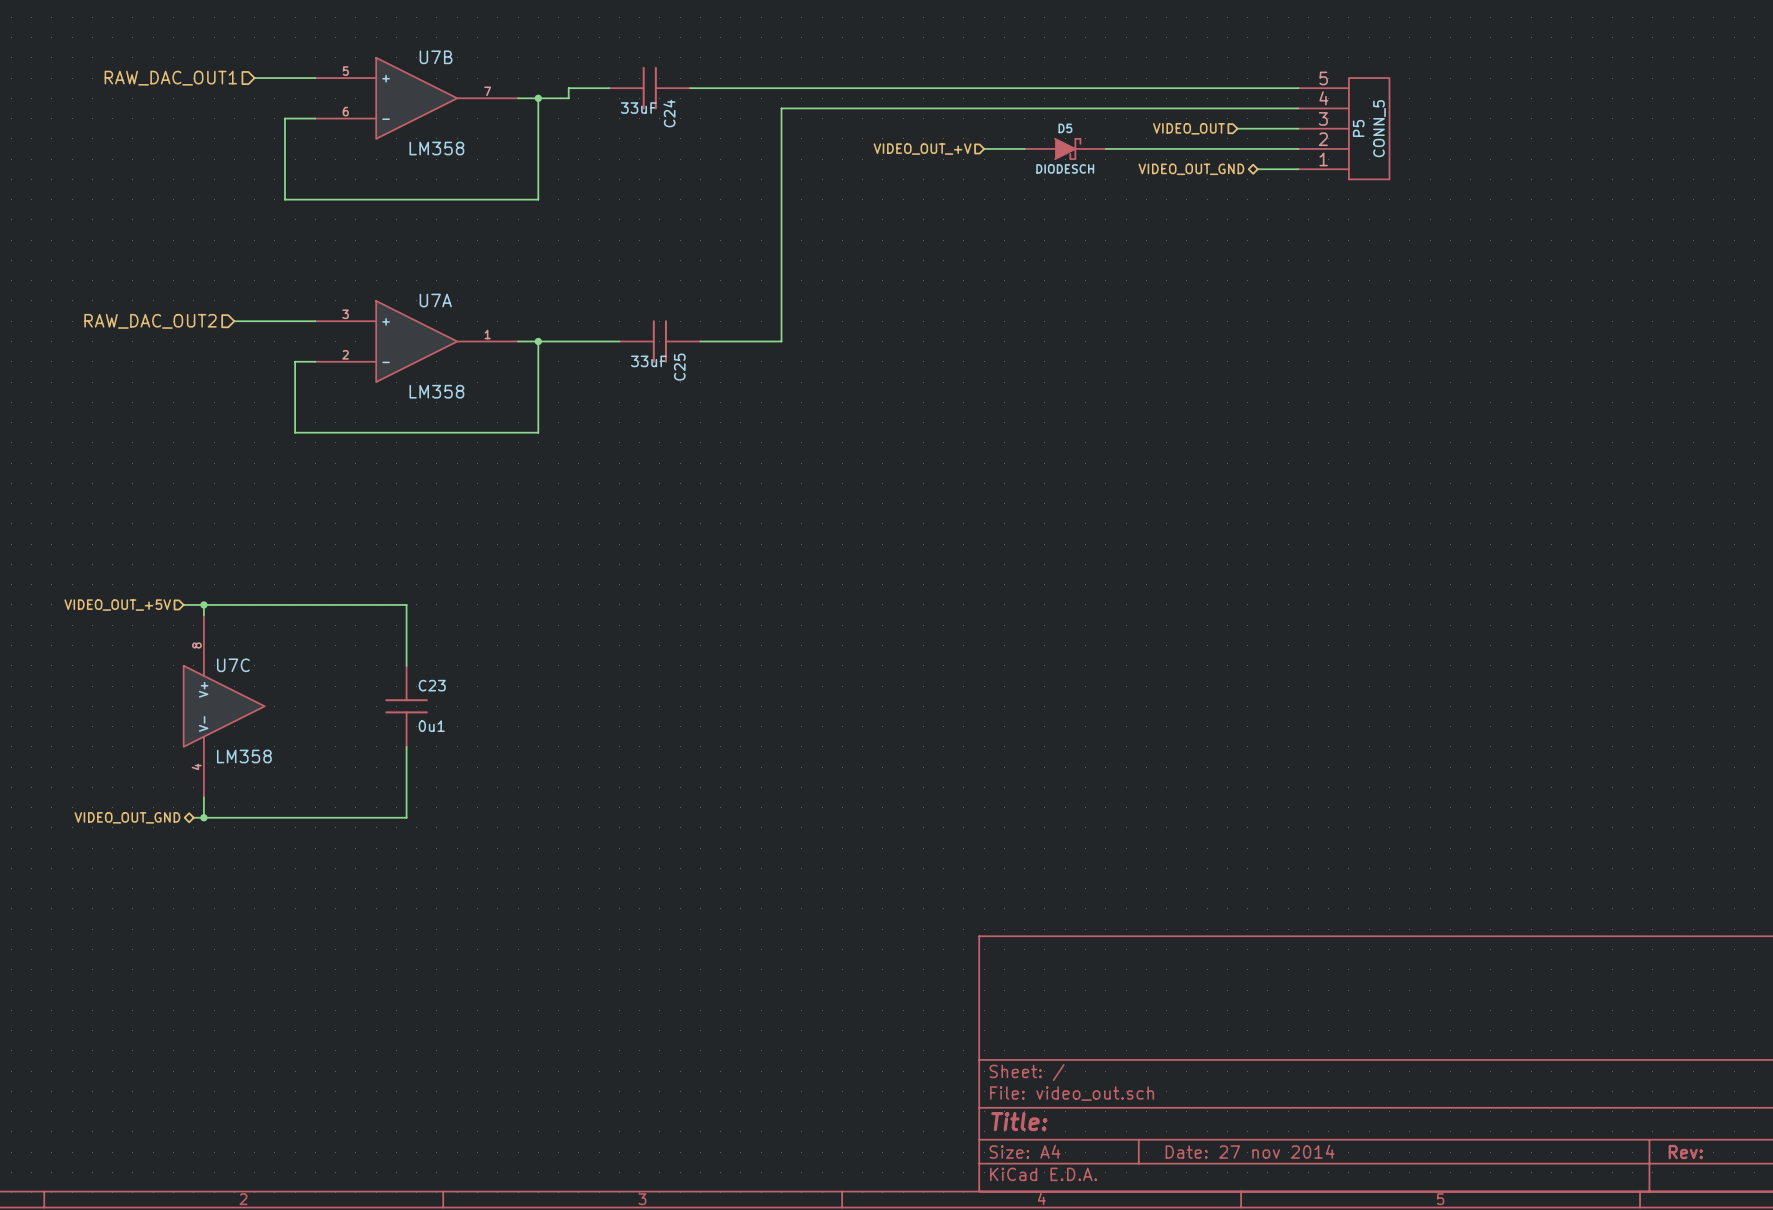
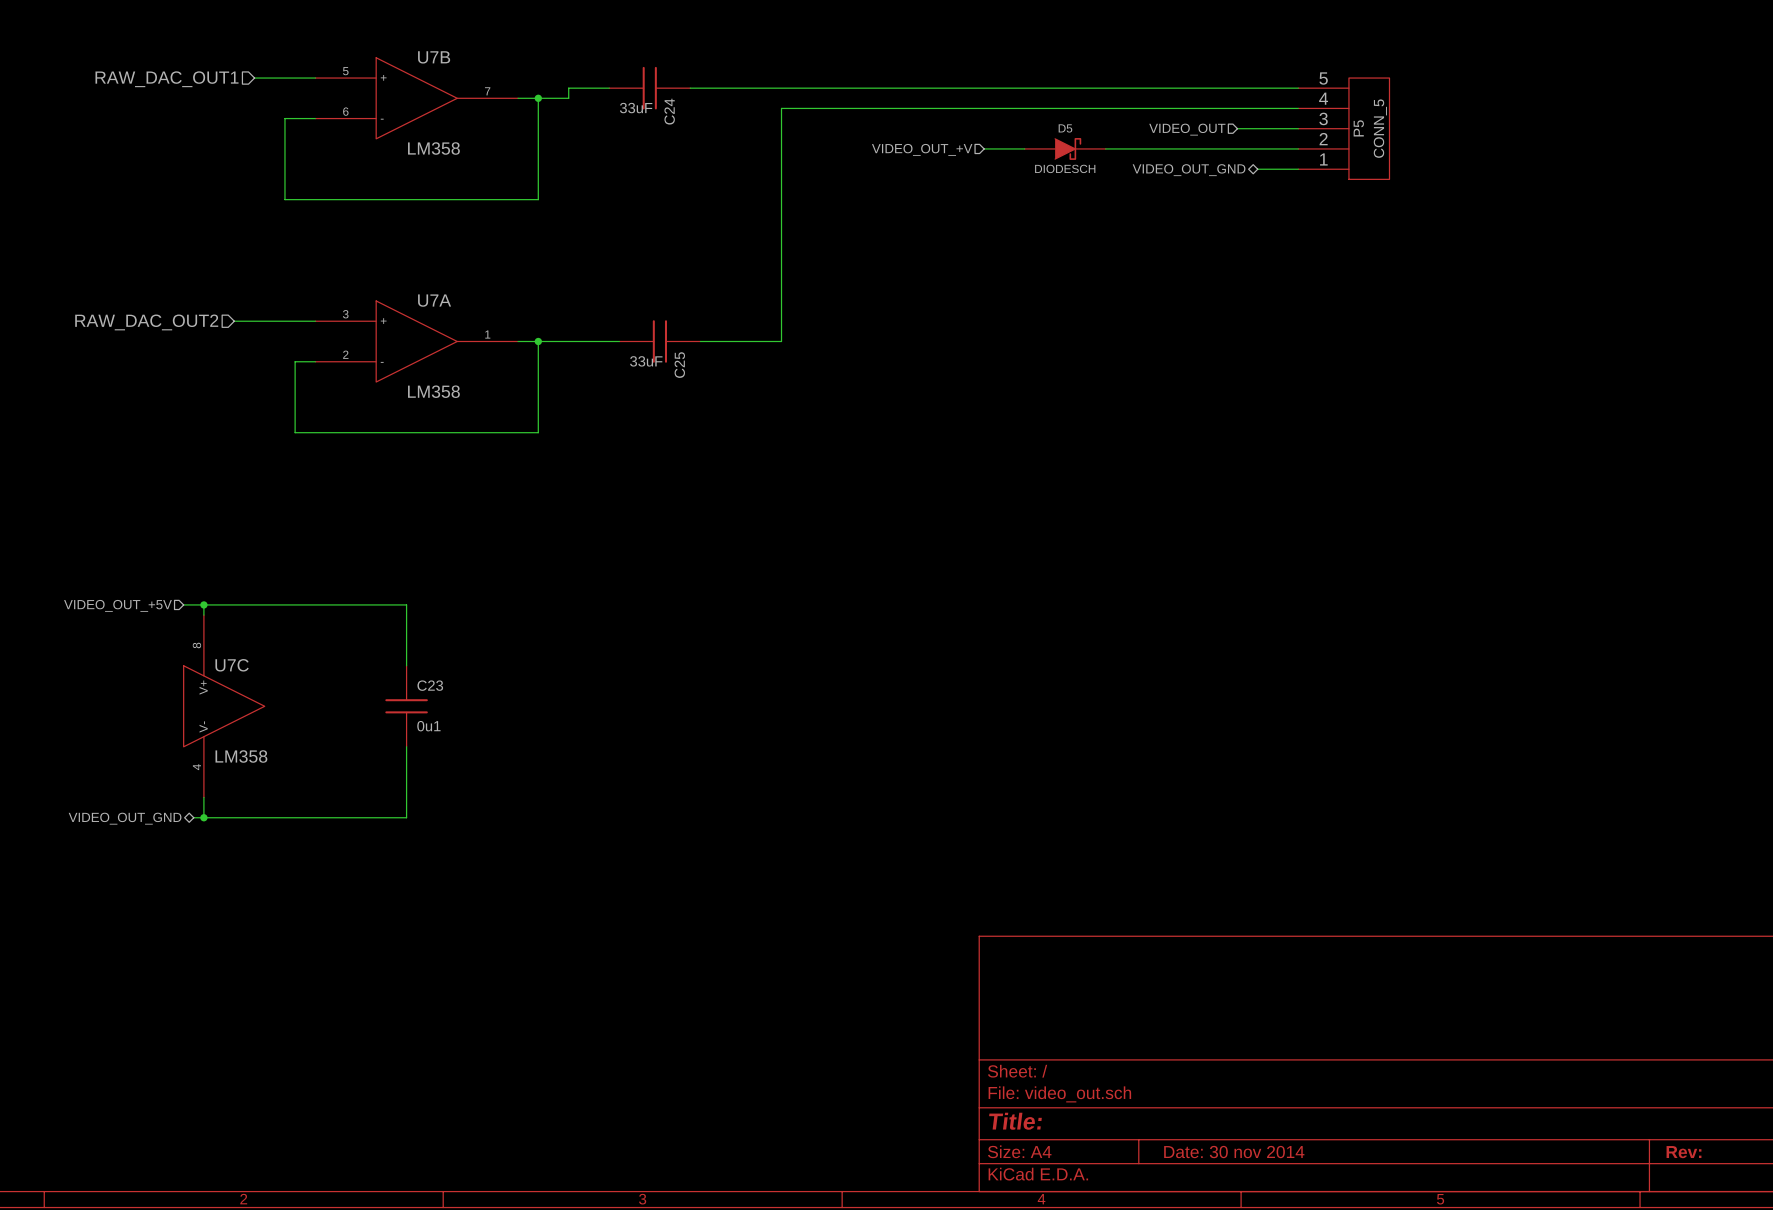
title block: Date: 27 nov 2014 (1250, 1151) -> Date: 30 nov 2014 (1234, 1152)

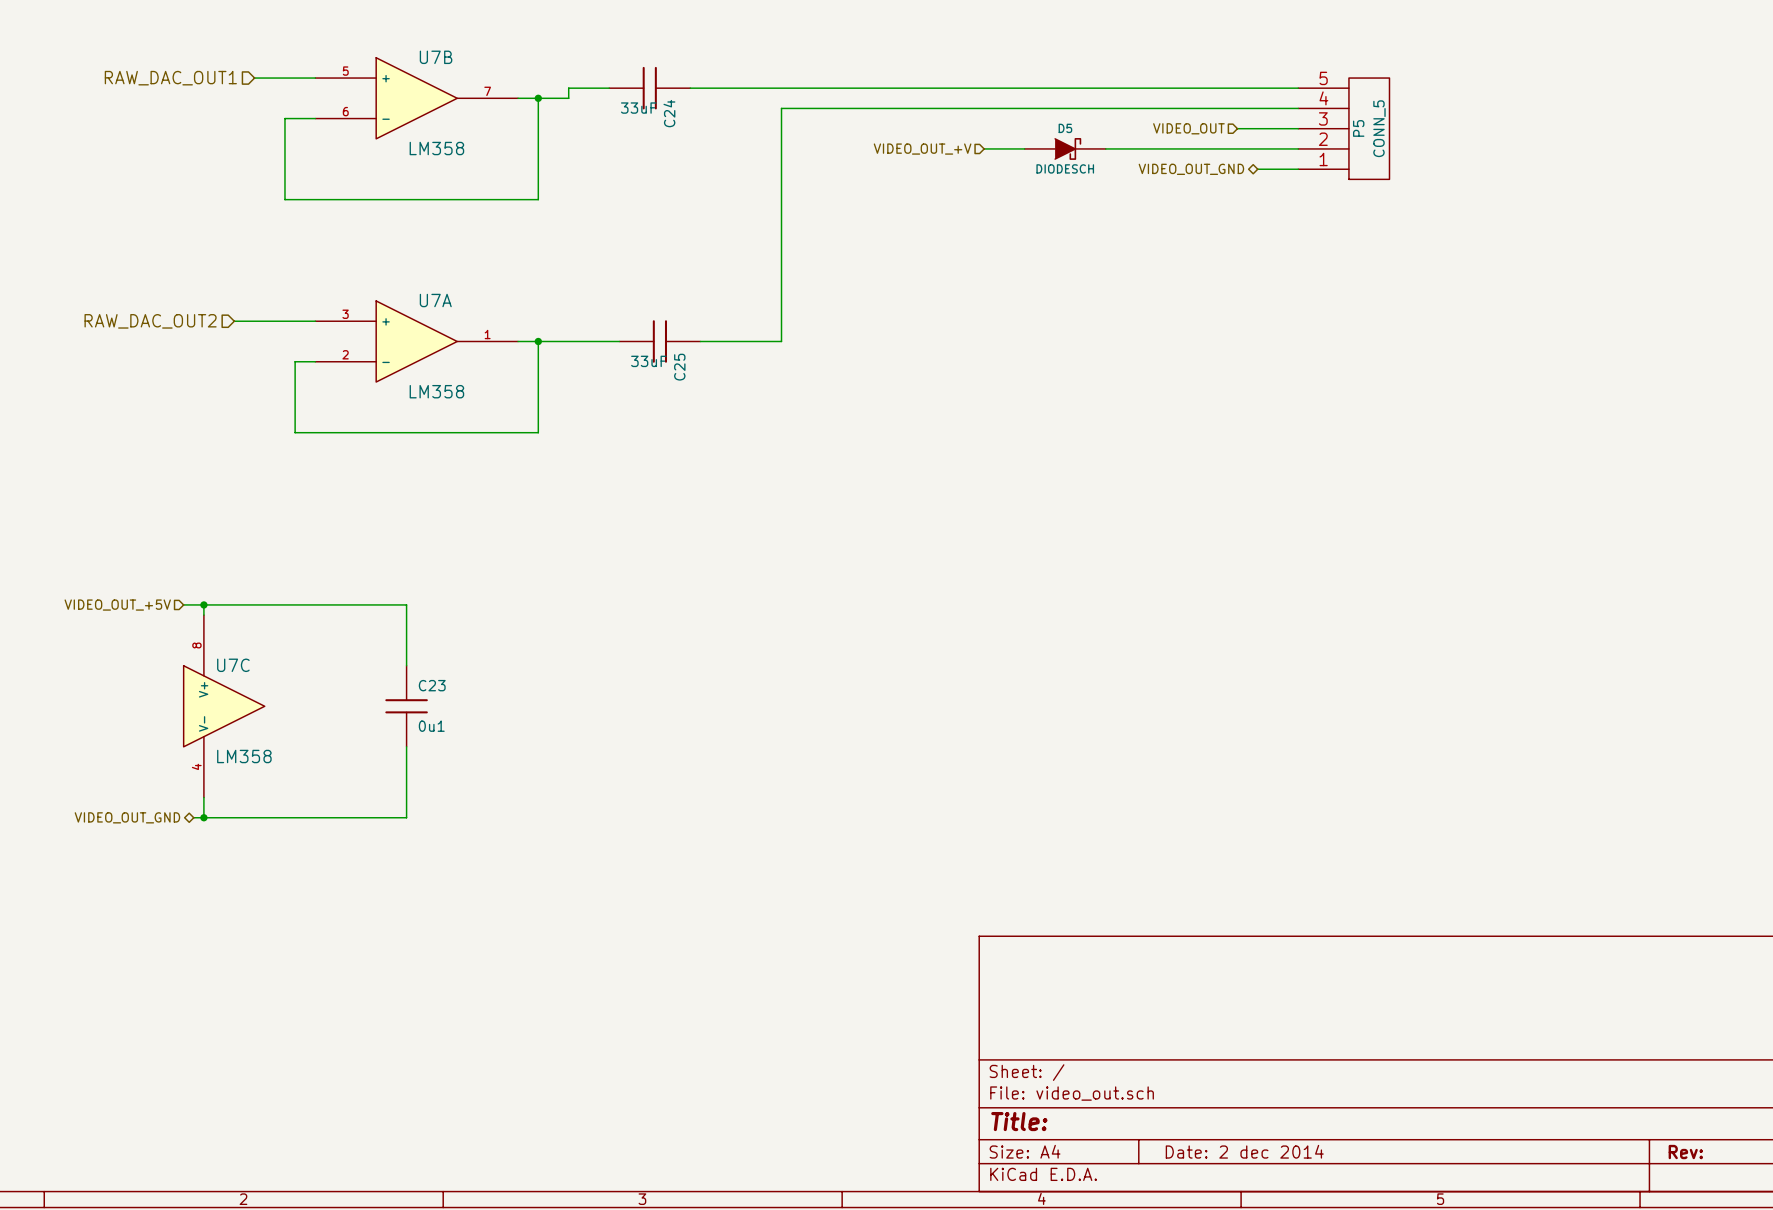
title block: Date: 30 nov 2014 (1234, 1152) -> Date: 2 dec 2014 (1244, 1151)

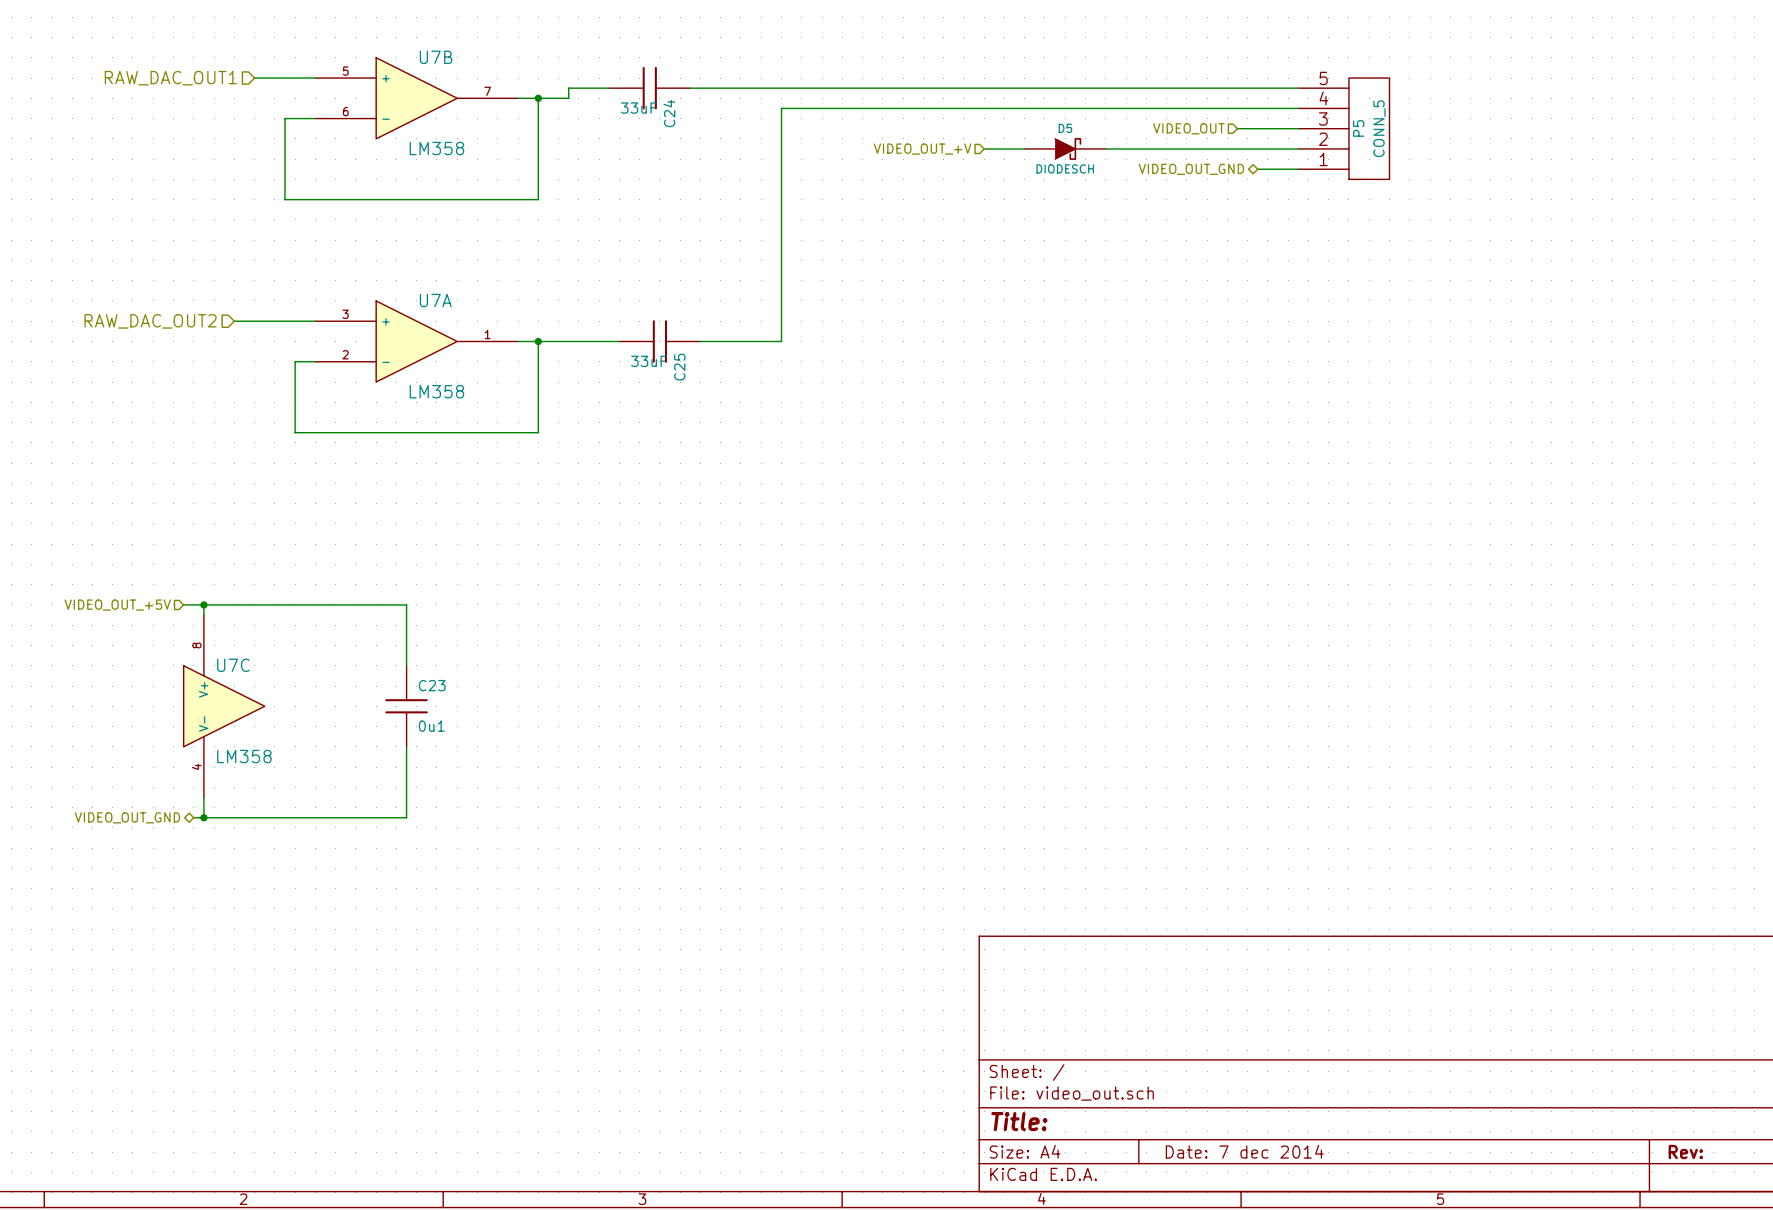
title block: Date: 2 dec 2014 (1244, 1151) -> Date: 7 dec 2014 (1244, 1151)

